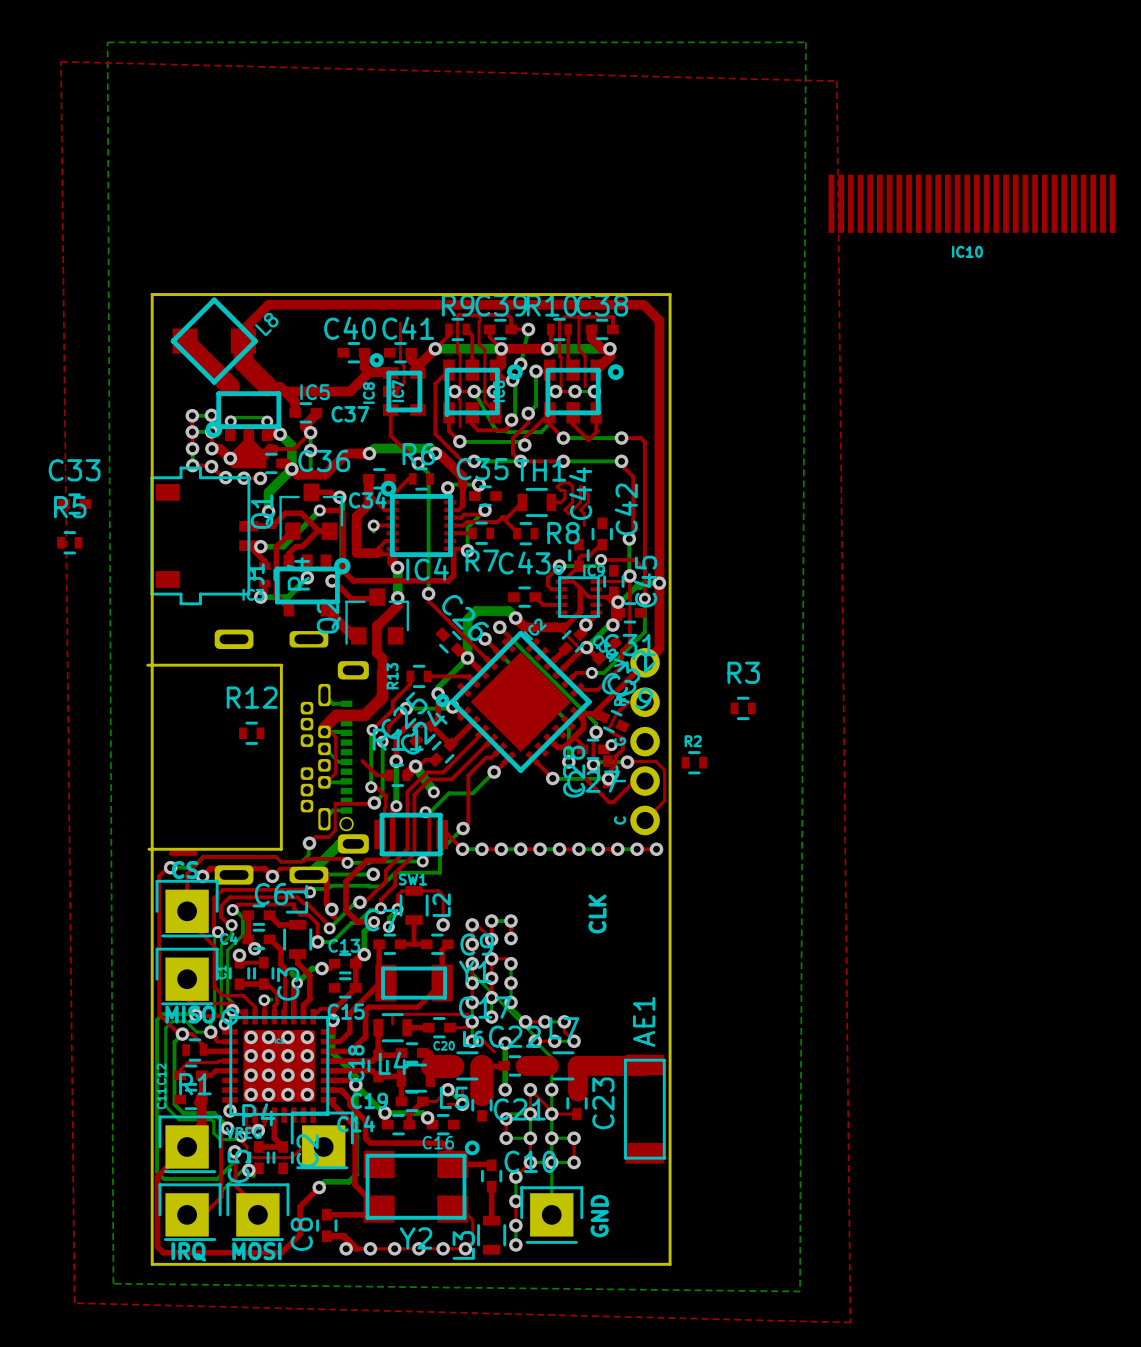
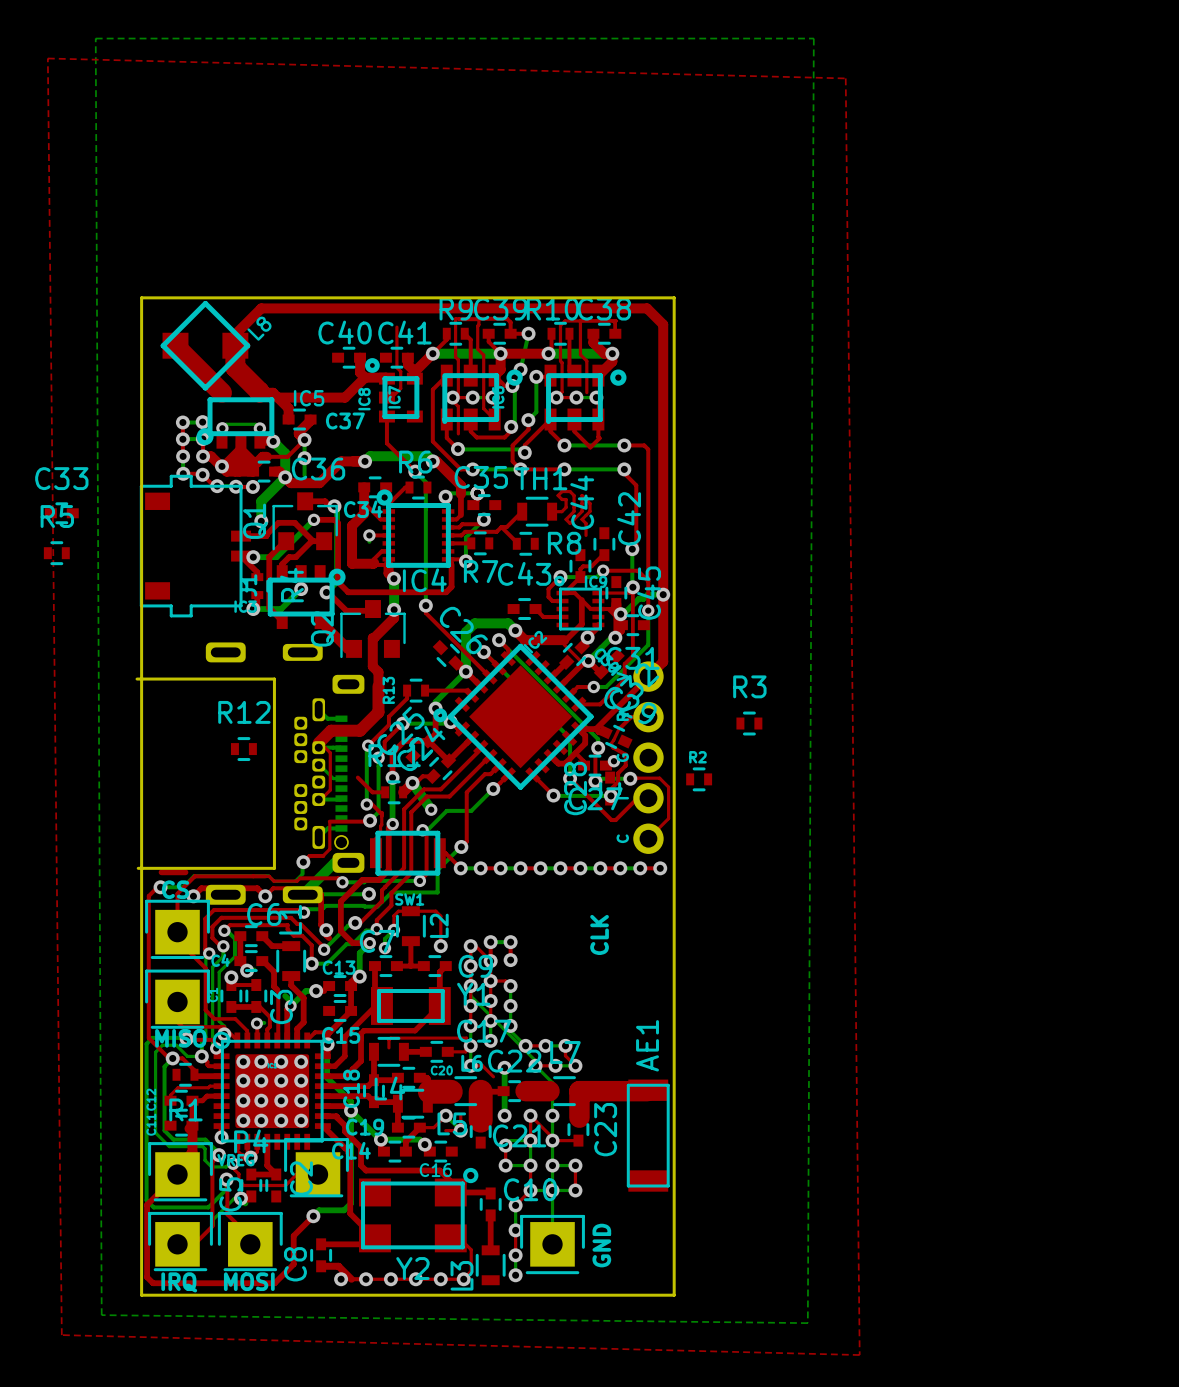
IC10: (972, 203) -> none
bottom track: (474, 391) (497, 430) (541, 432) (547, 425) -> none

